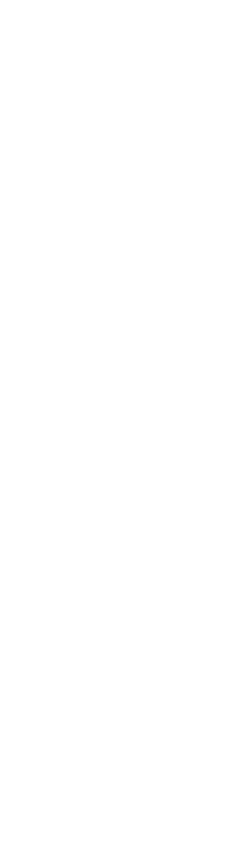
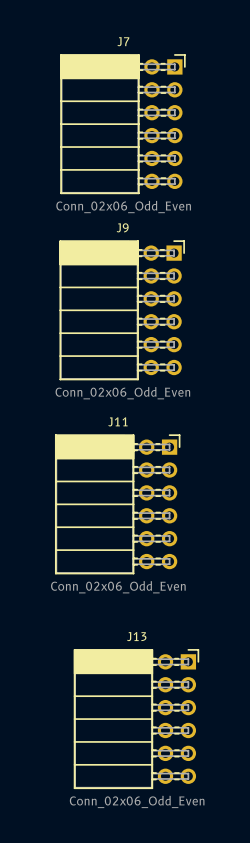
J7: none -> Conn_02x06_Odd_Even (122, 124)
J9: none -> Conn_02x06_Odd_Even (122, 310)
J11: none -> Conn_02x06_Odd_Even (117, 504)
J13: none -> Conn_02x06_Odd_Even (136, 719)

